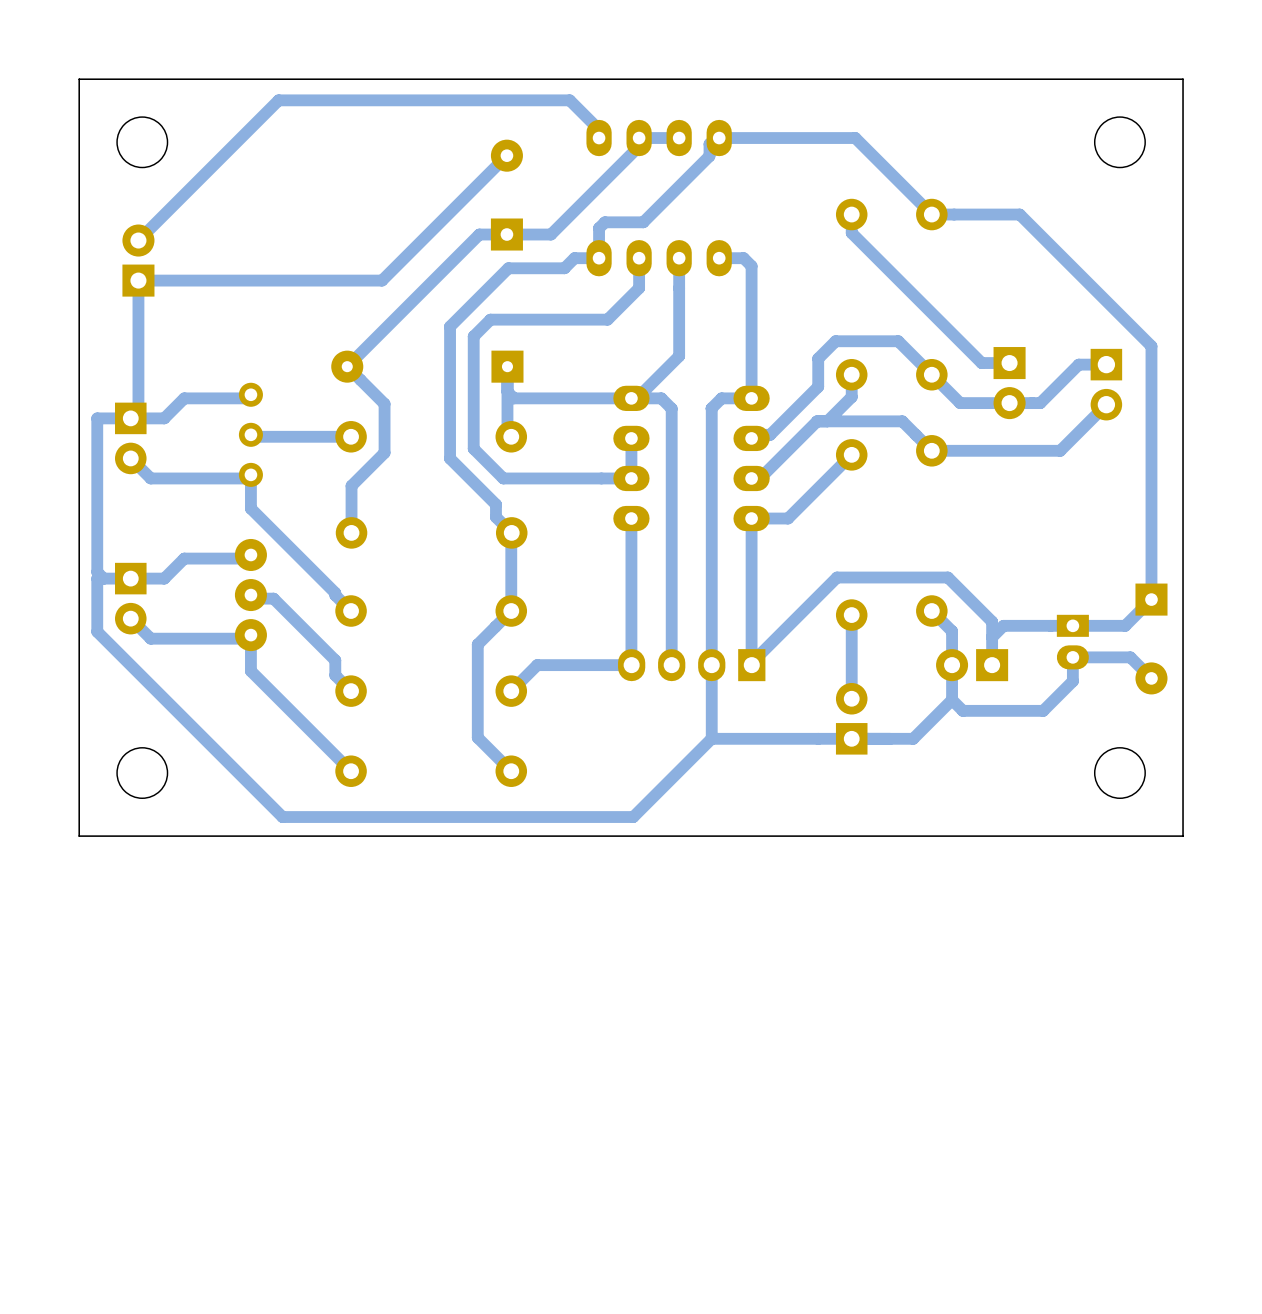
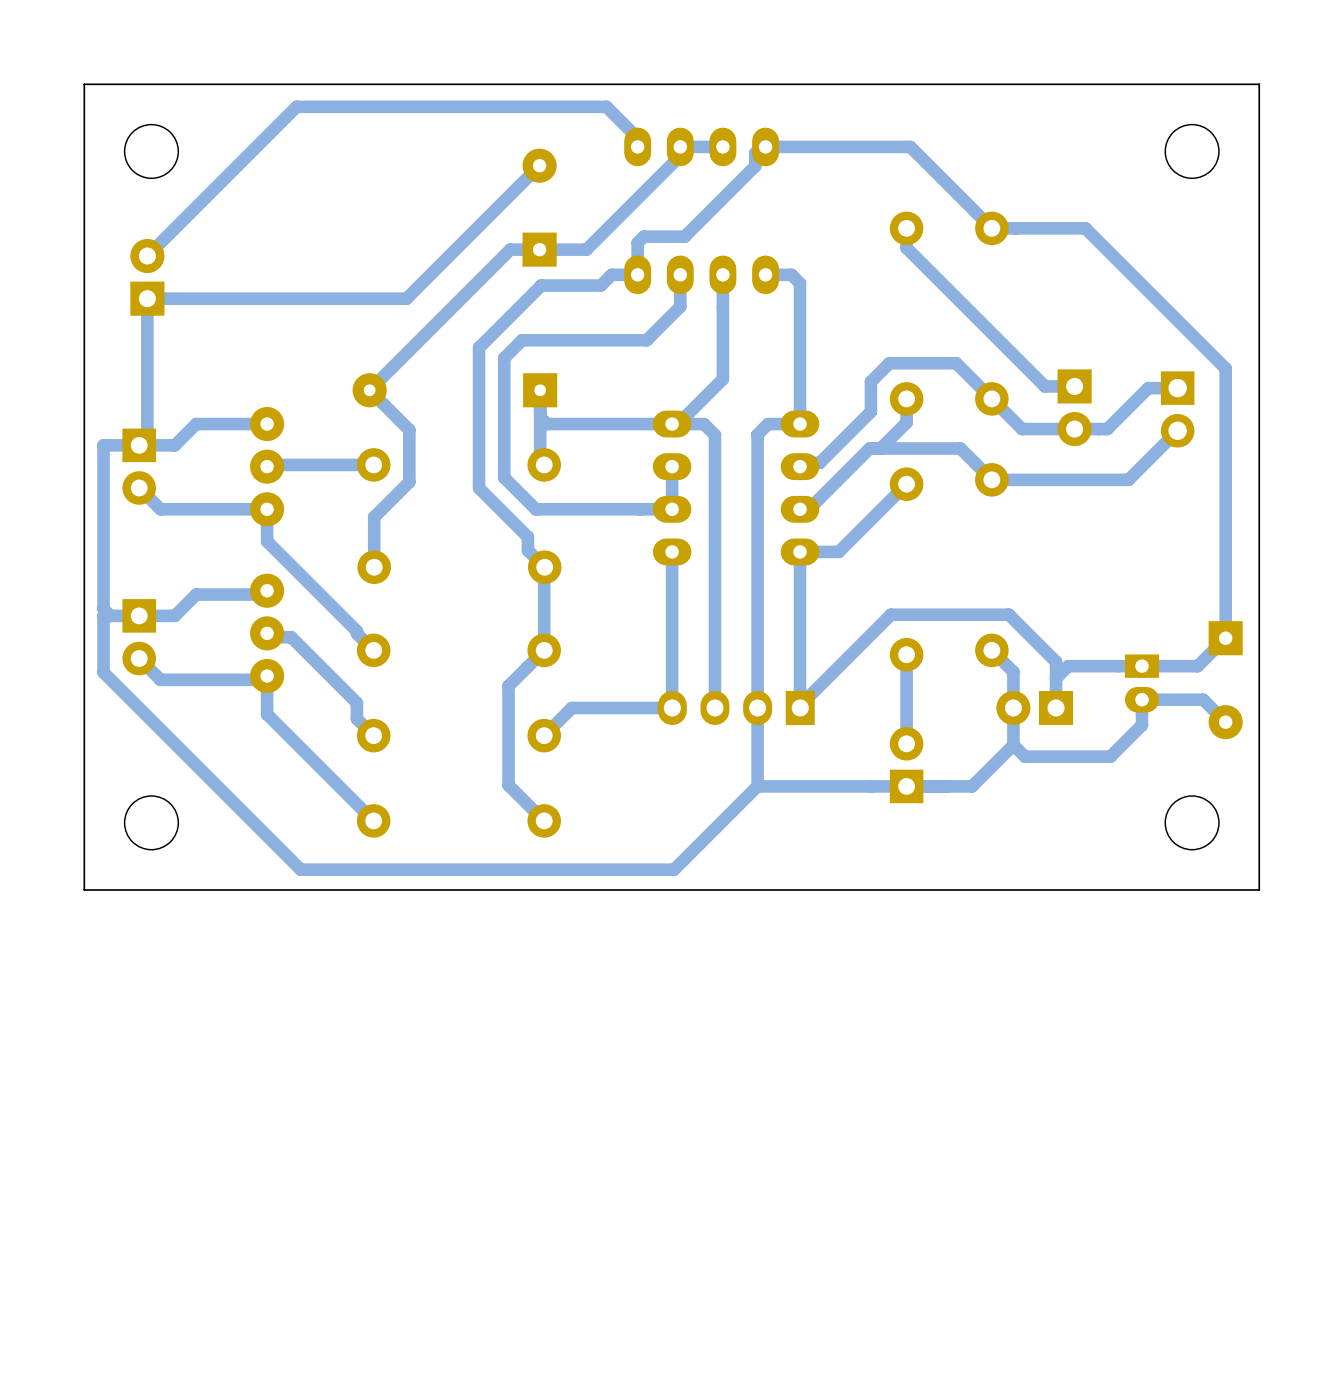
part footprint: [238, 382, 263, 487] -> [250, 406, 285, 527]

